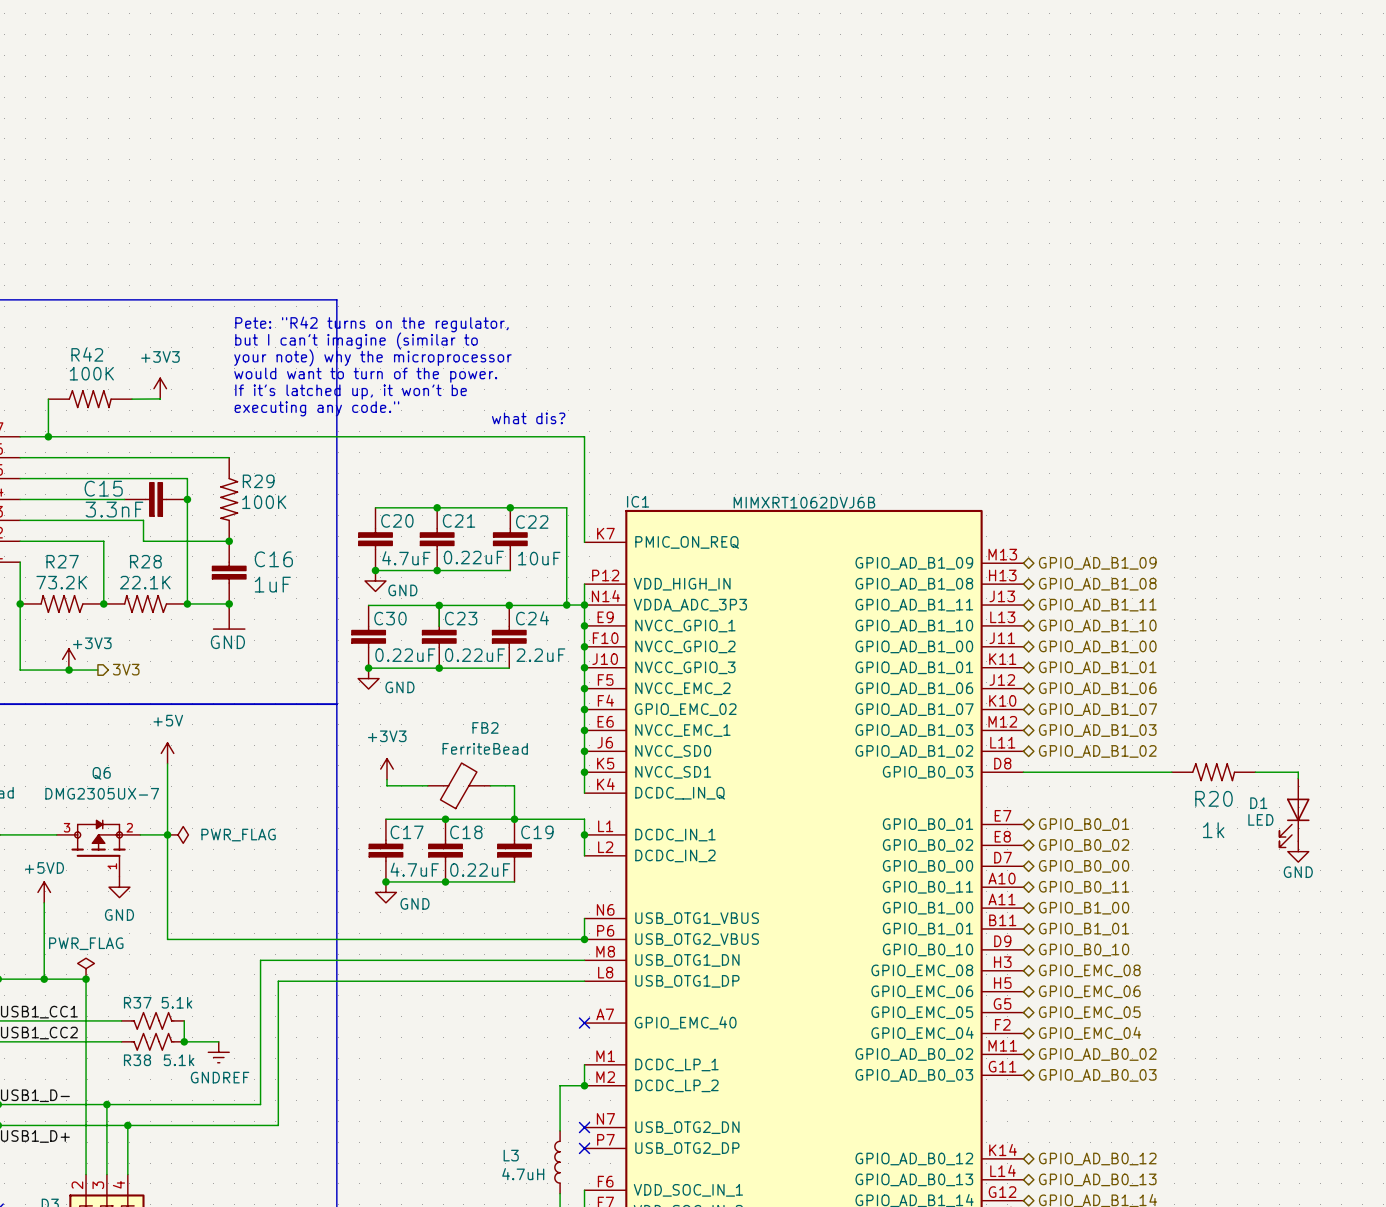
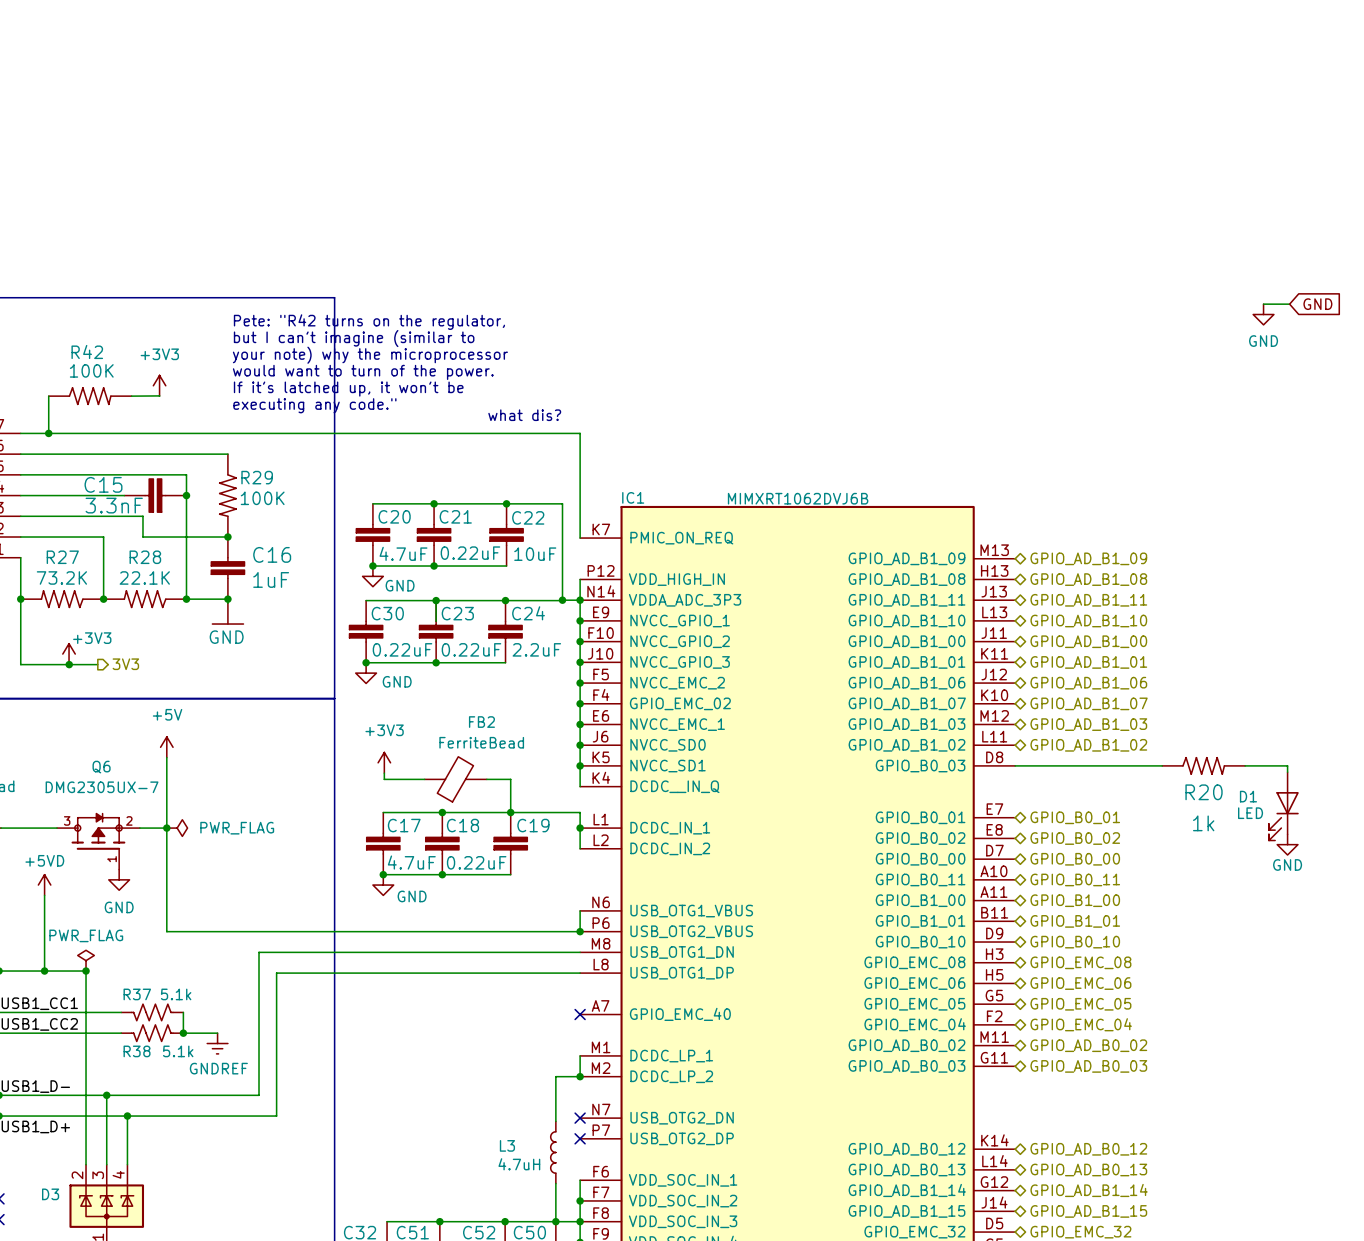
wire: none -> (1263, 304) (1289, 304)
global label: none -> GND (1317, 304)
power symbol: none -> GND (1263, 314)

